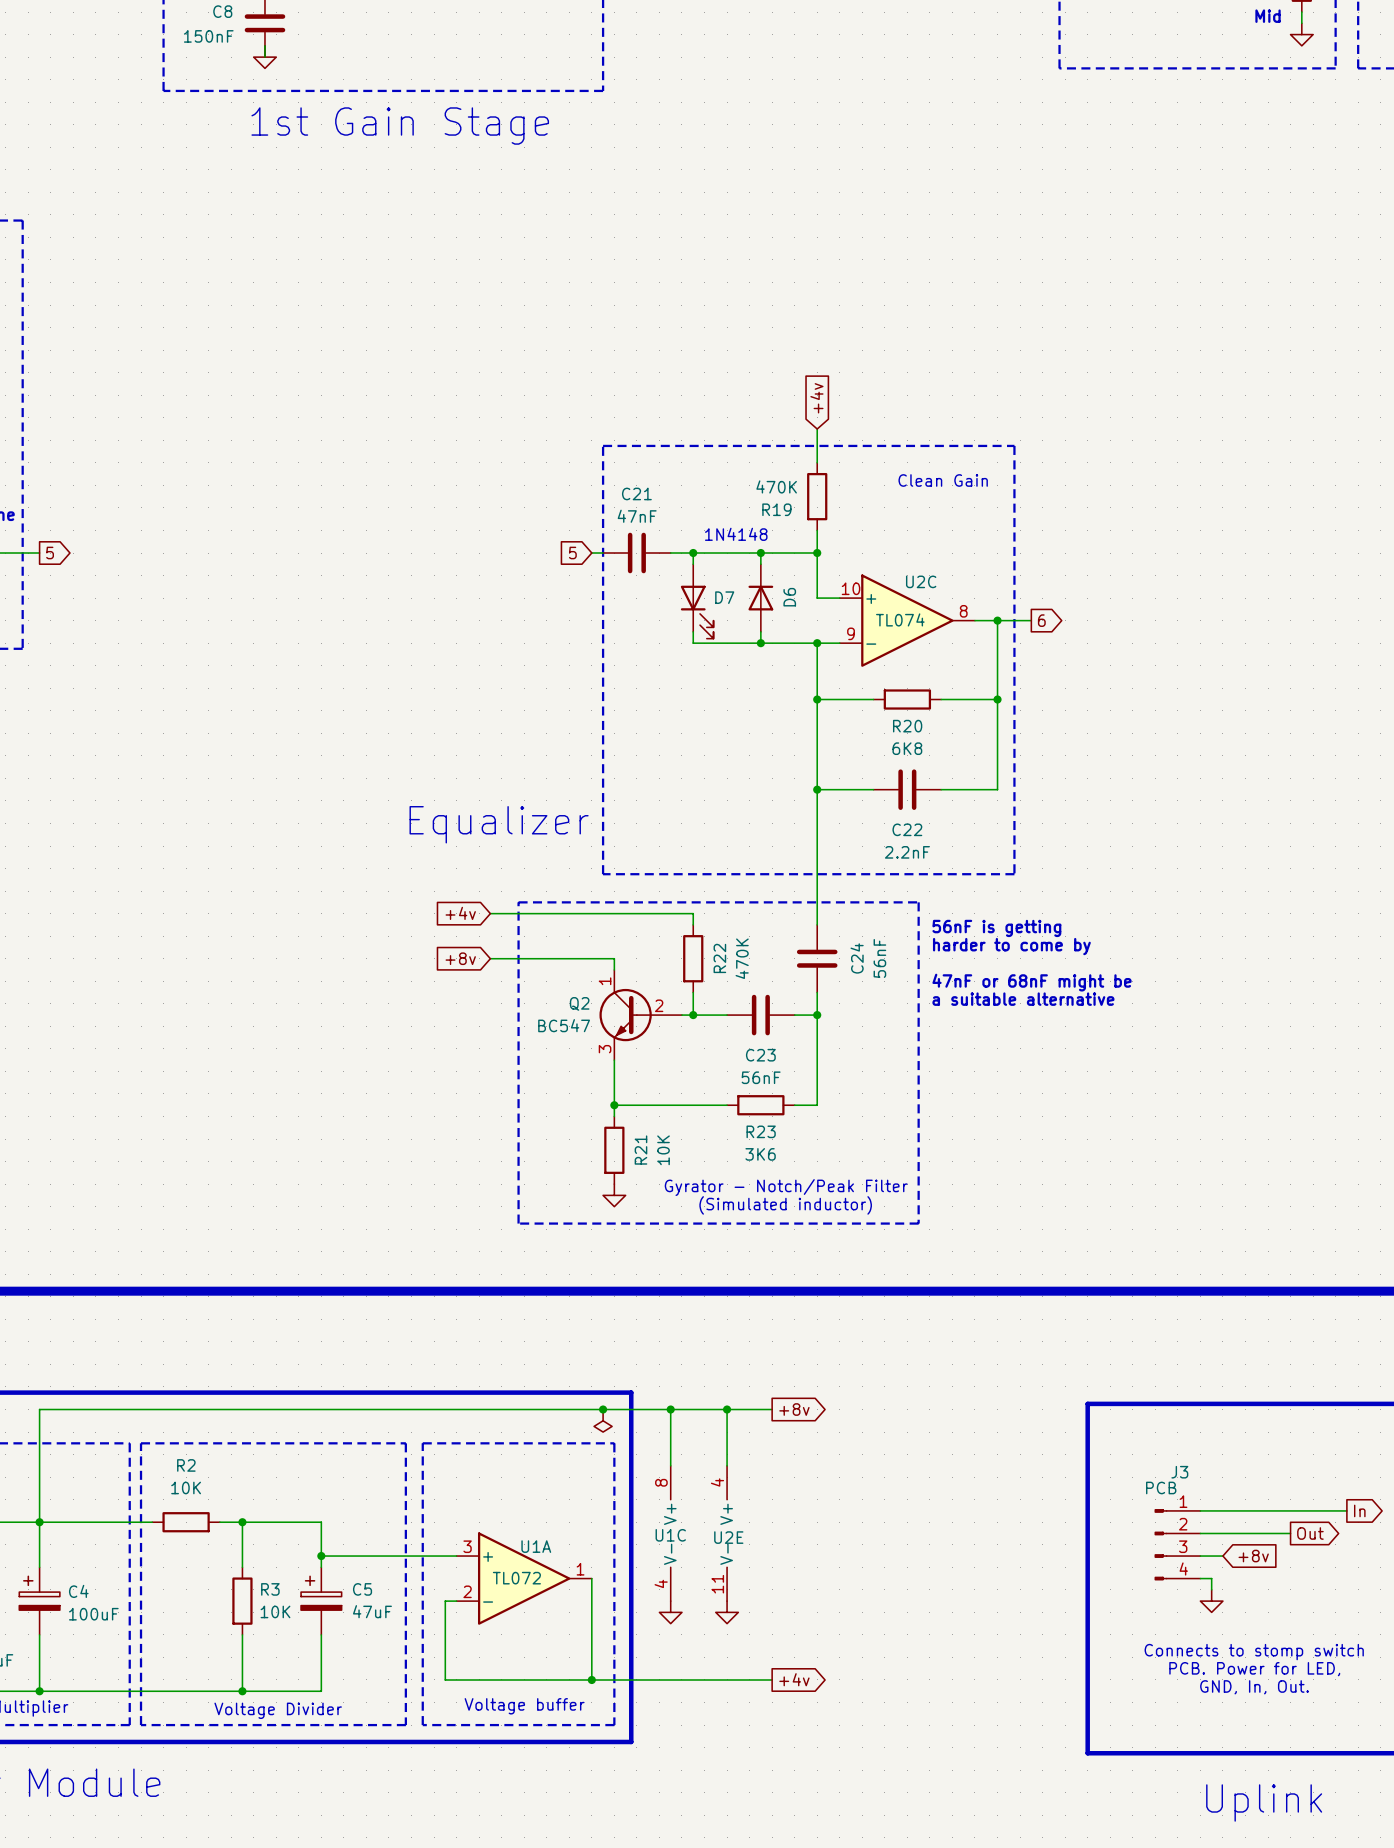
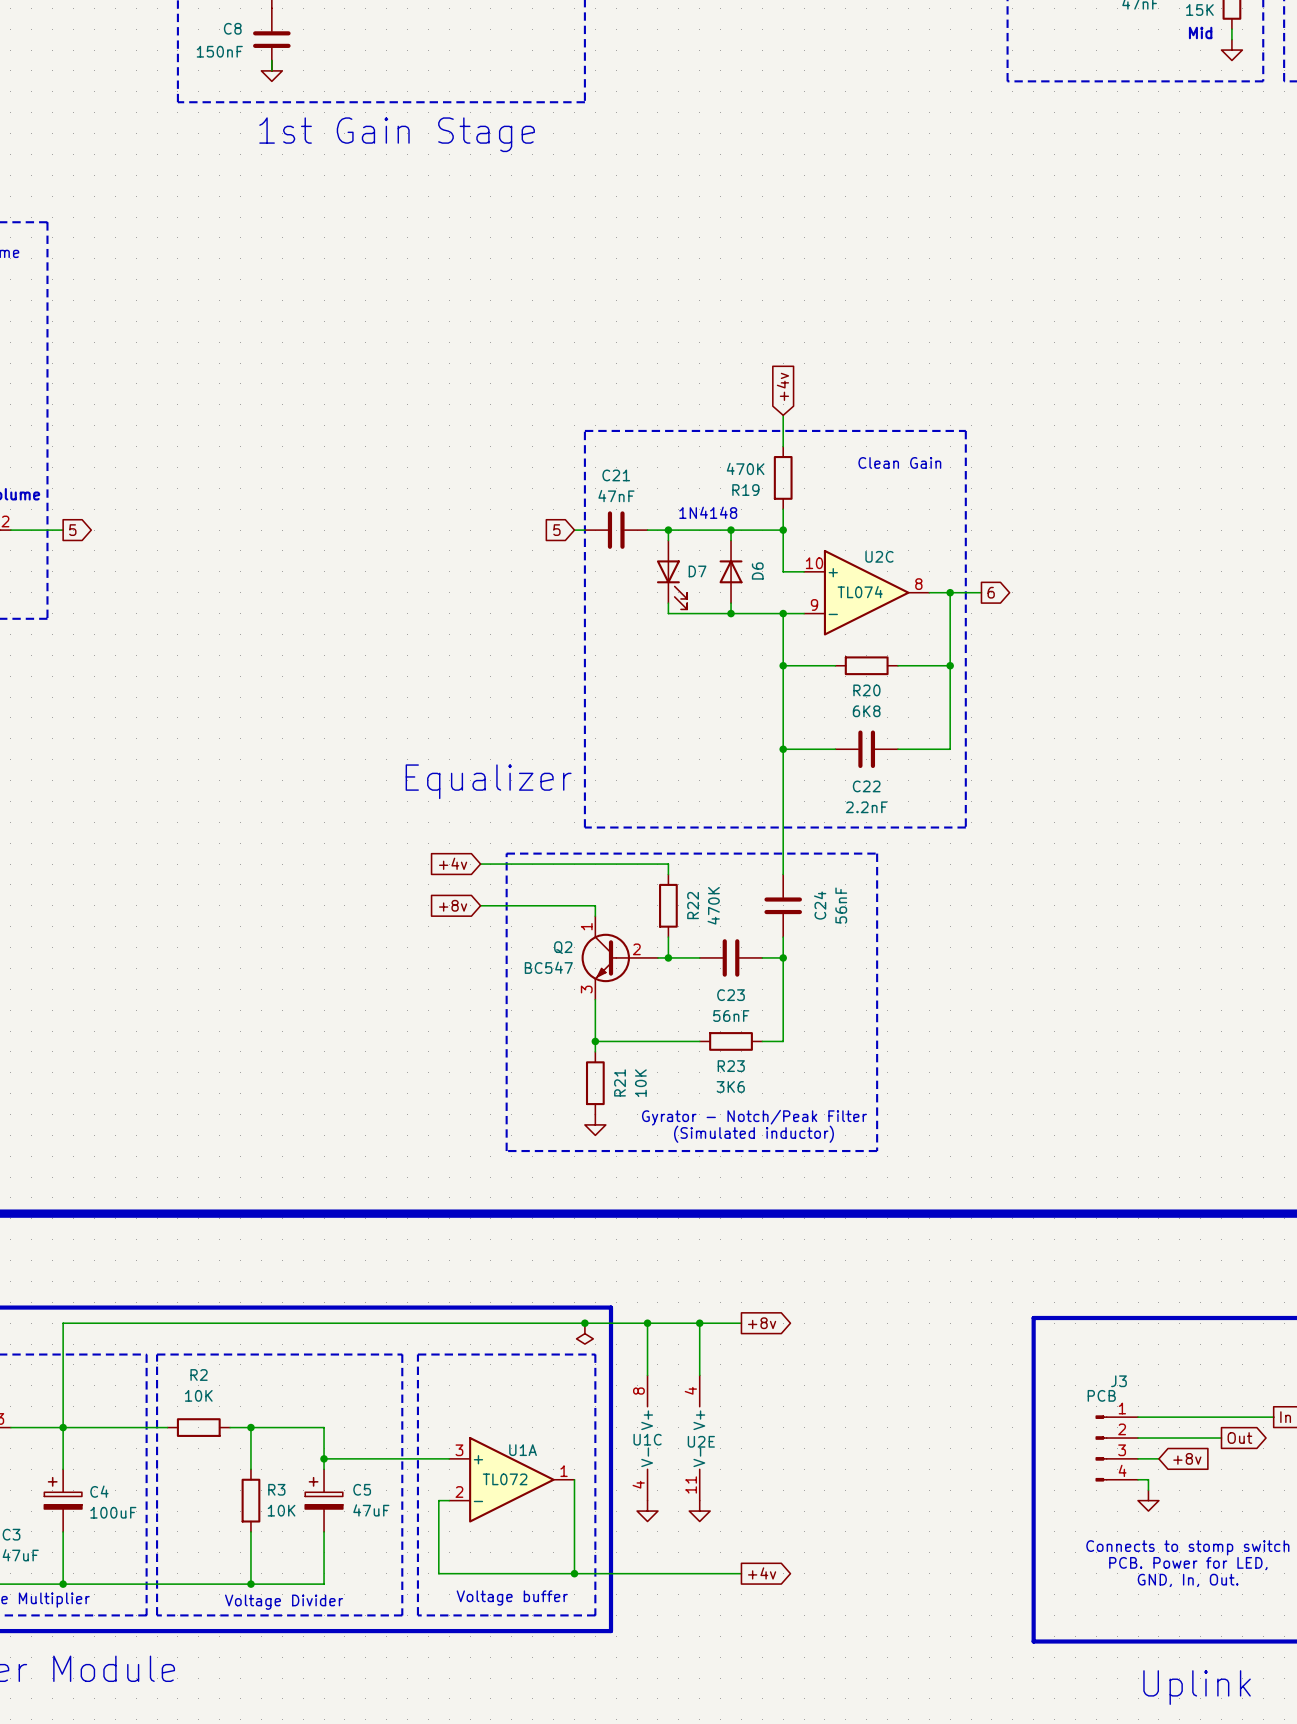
text: 56nF is getting (996, 928) -> none
text: harder to come by (1011, 946) -> none
text: 47nF or 68nF might be (1032, 982) -> none
text: a suitable alternative (1023, 999) -> none

